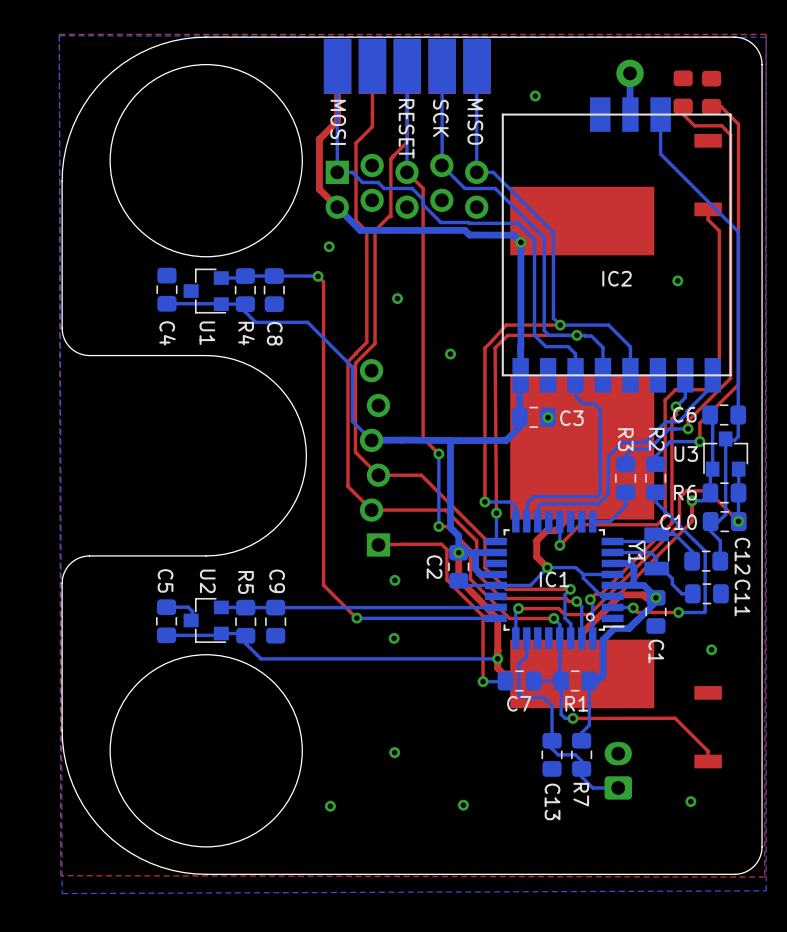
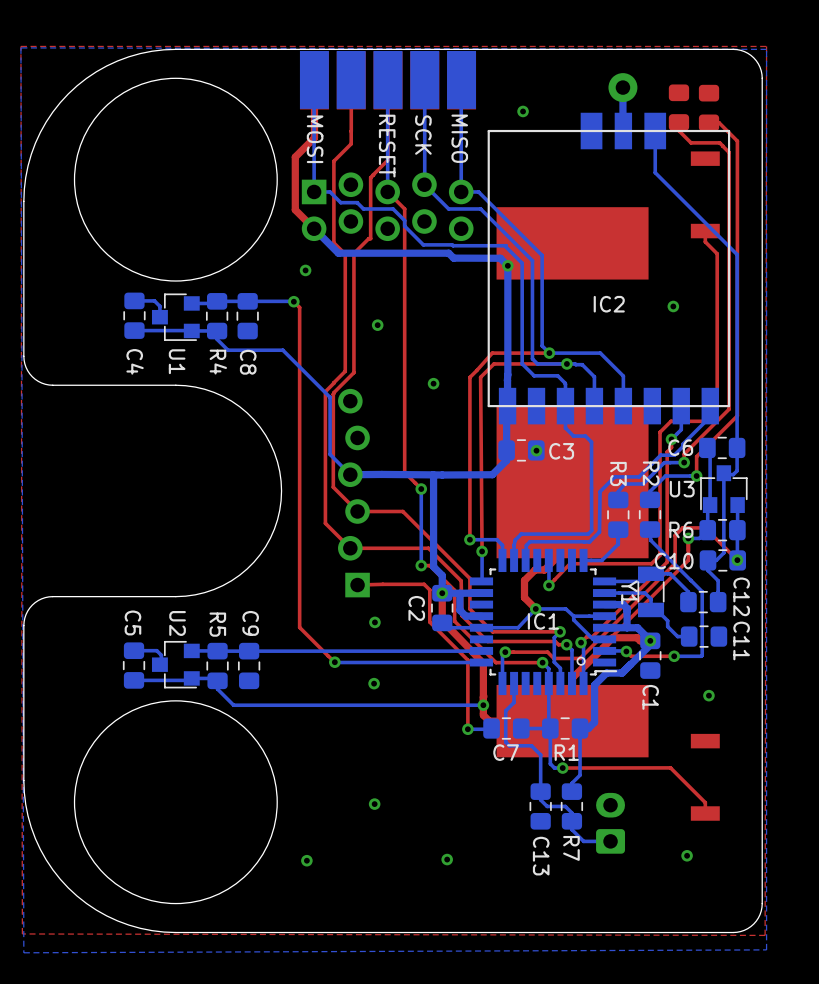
bottom track: none -> (154, 300) (159, 306) (159, 317)
bottom track: none -> (154, 300) (134, 300)

